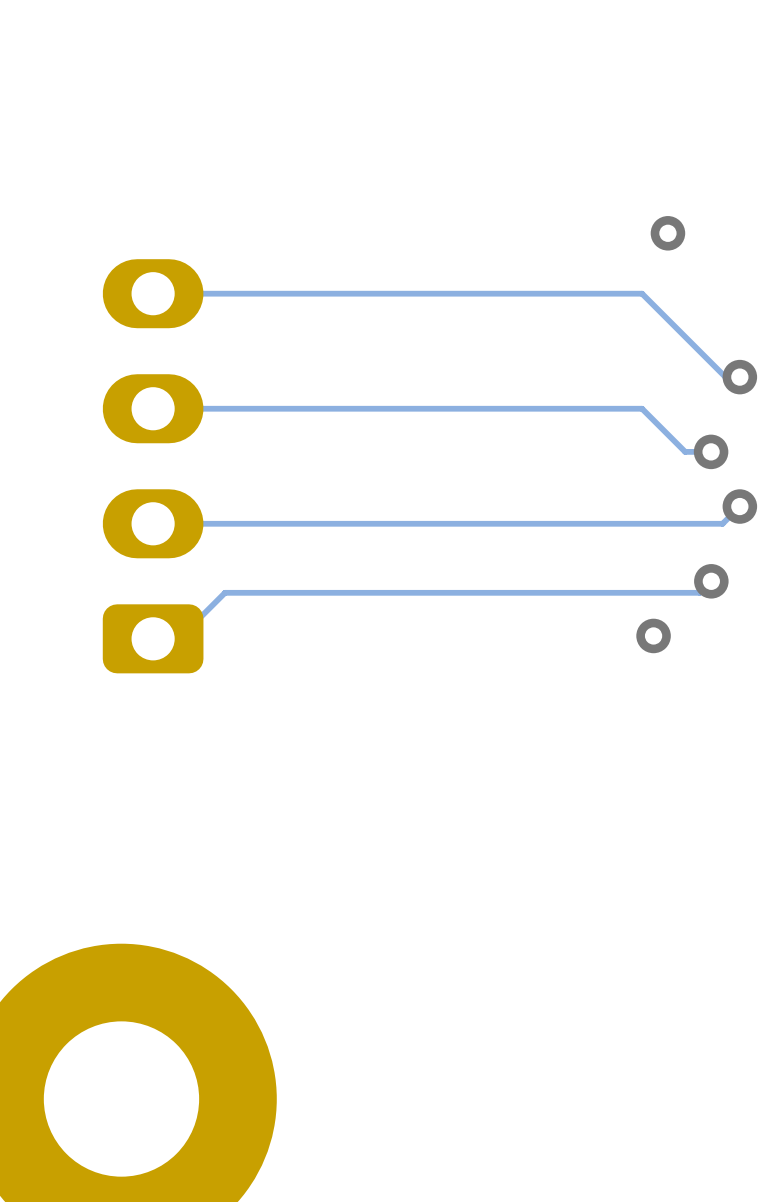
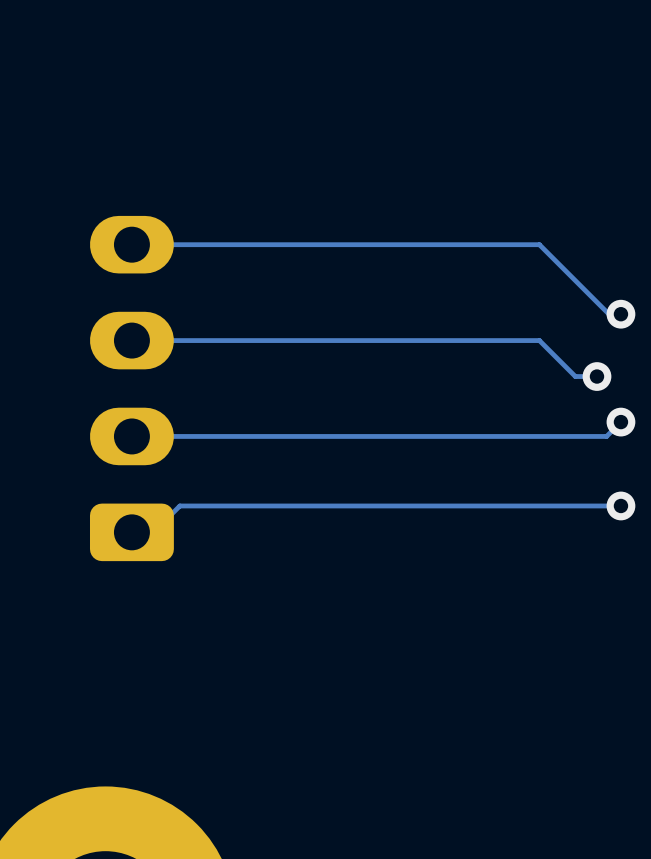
via: (667, 233) -> none
track: (711, 581) (699, 592) (225, 592) (210, 607) -> (620, 505) (179, 505)
via position: (711, 581) -> (620, 505)
via: (653, 635) -> none

